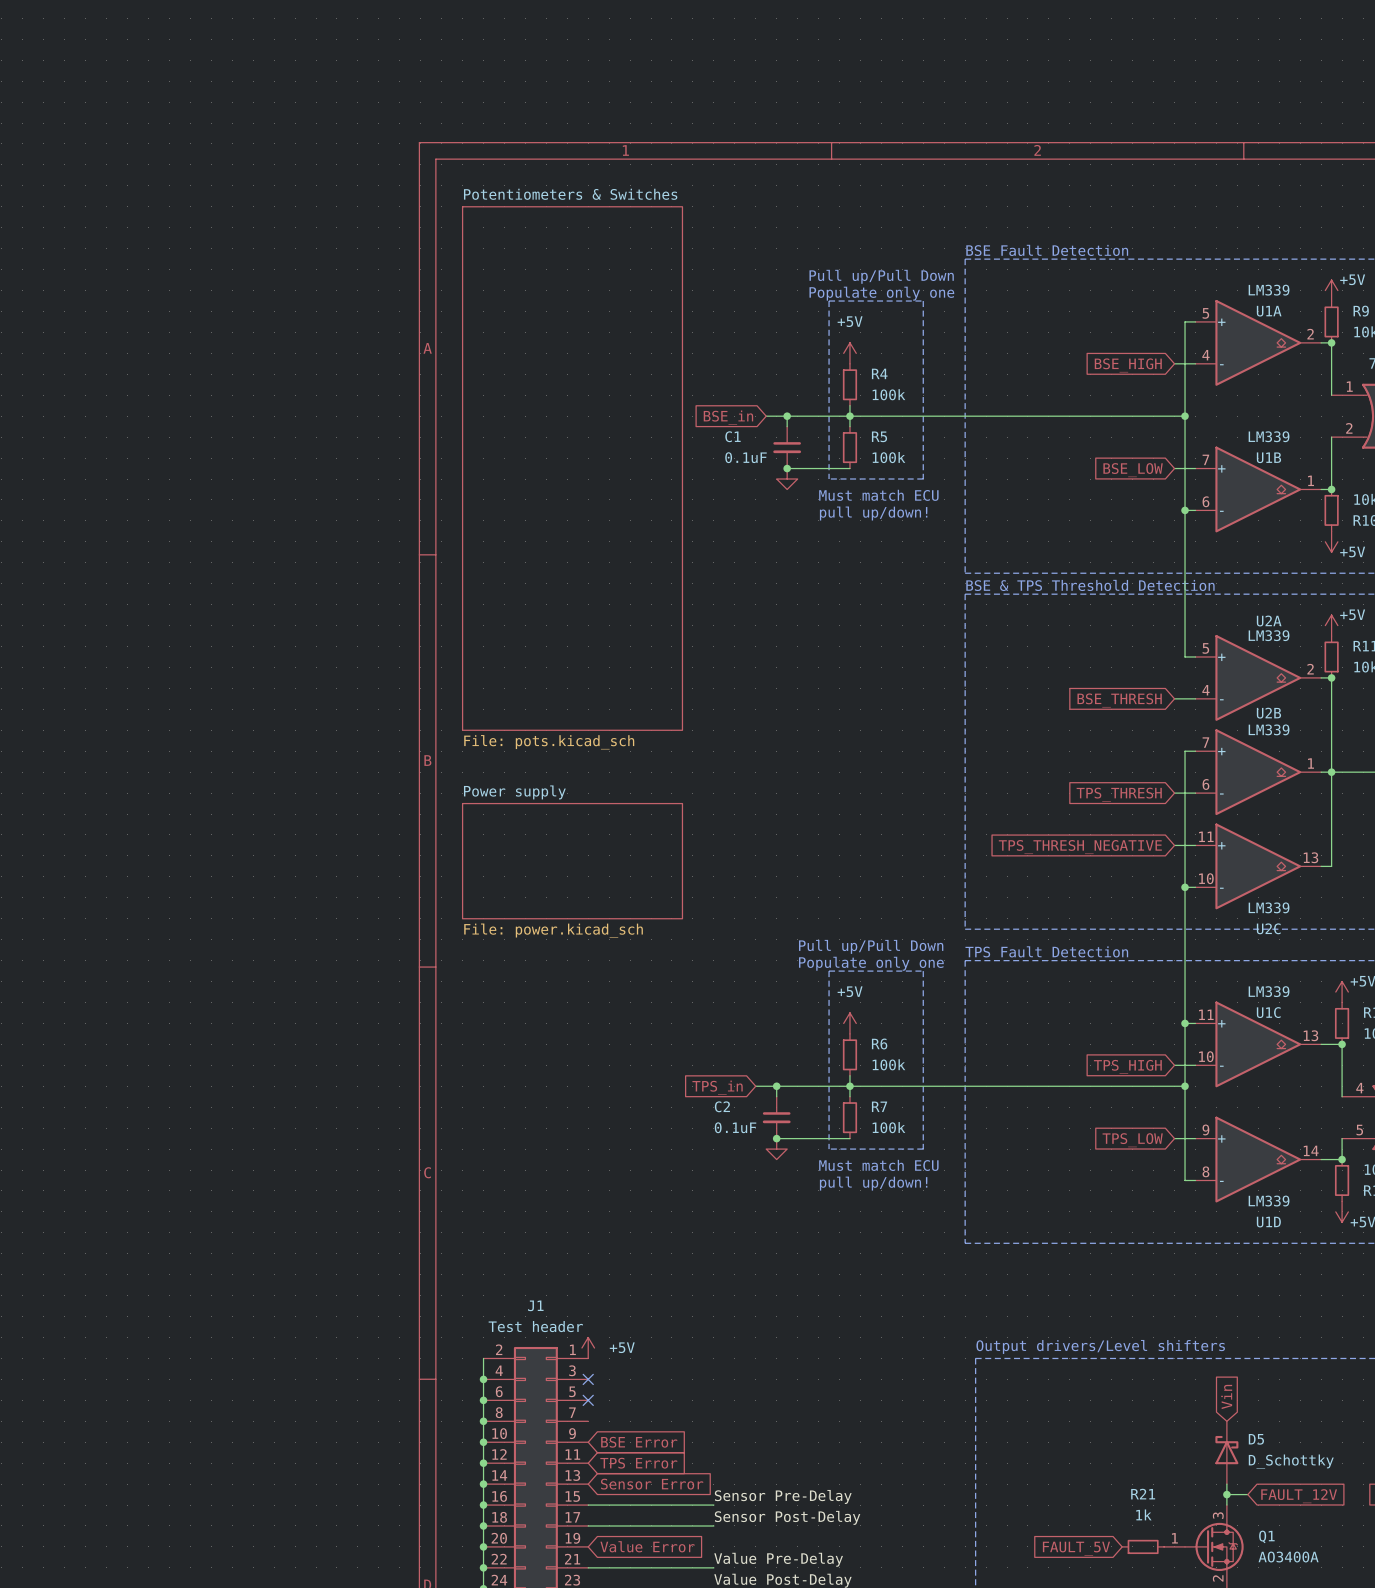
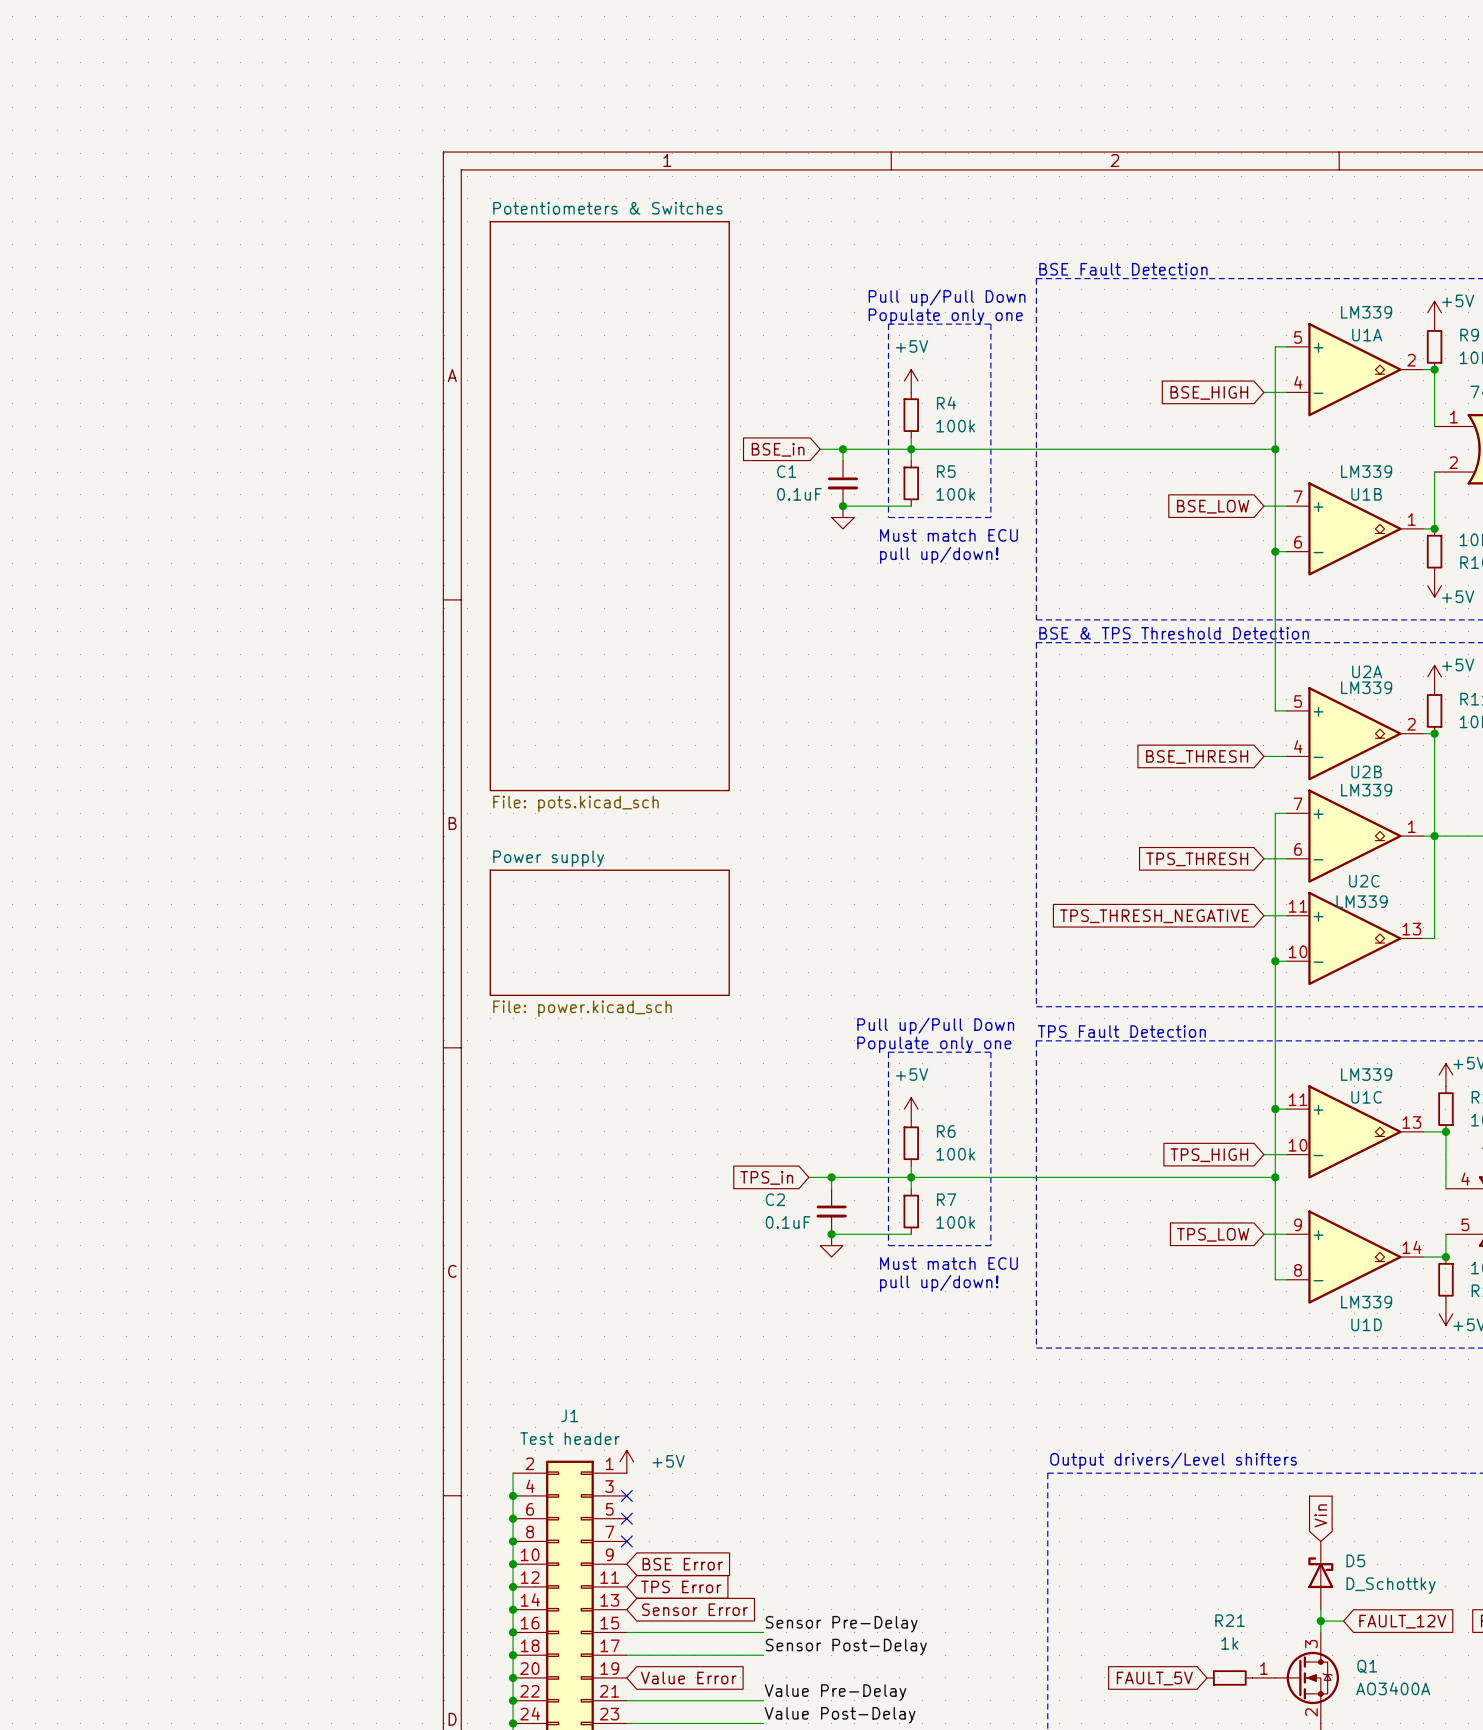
U2C value position: LM339 (1269, 907) -> LM339 (1362, 901)
U2C name position: U2C (1268, 928) -> U2C (1364, 881)
no-connect mark: none -> (626, 1541)

